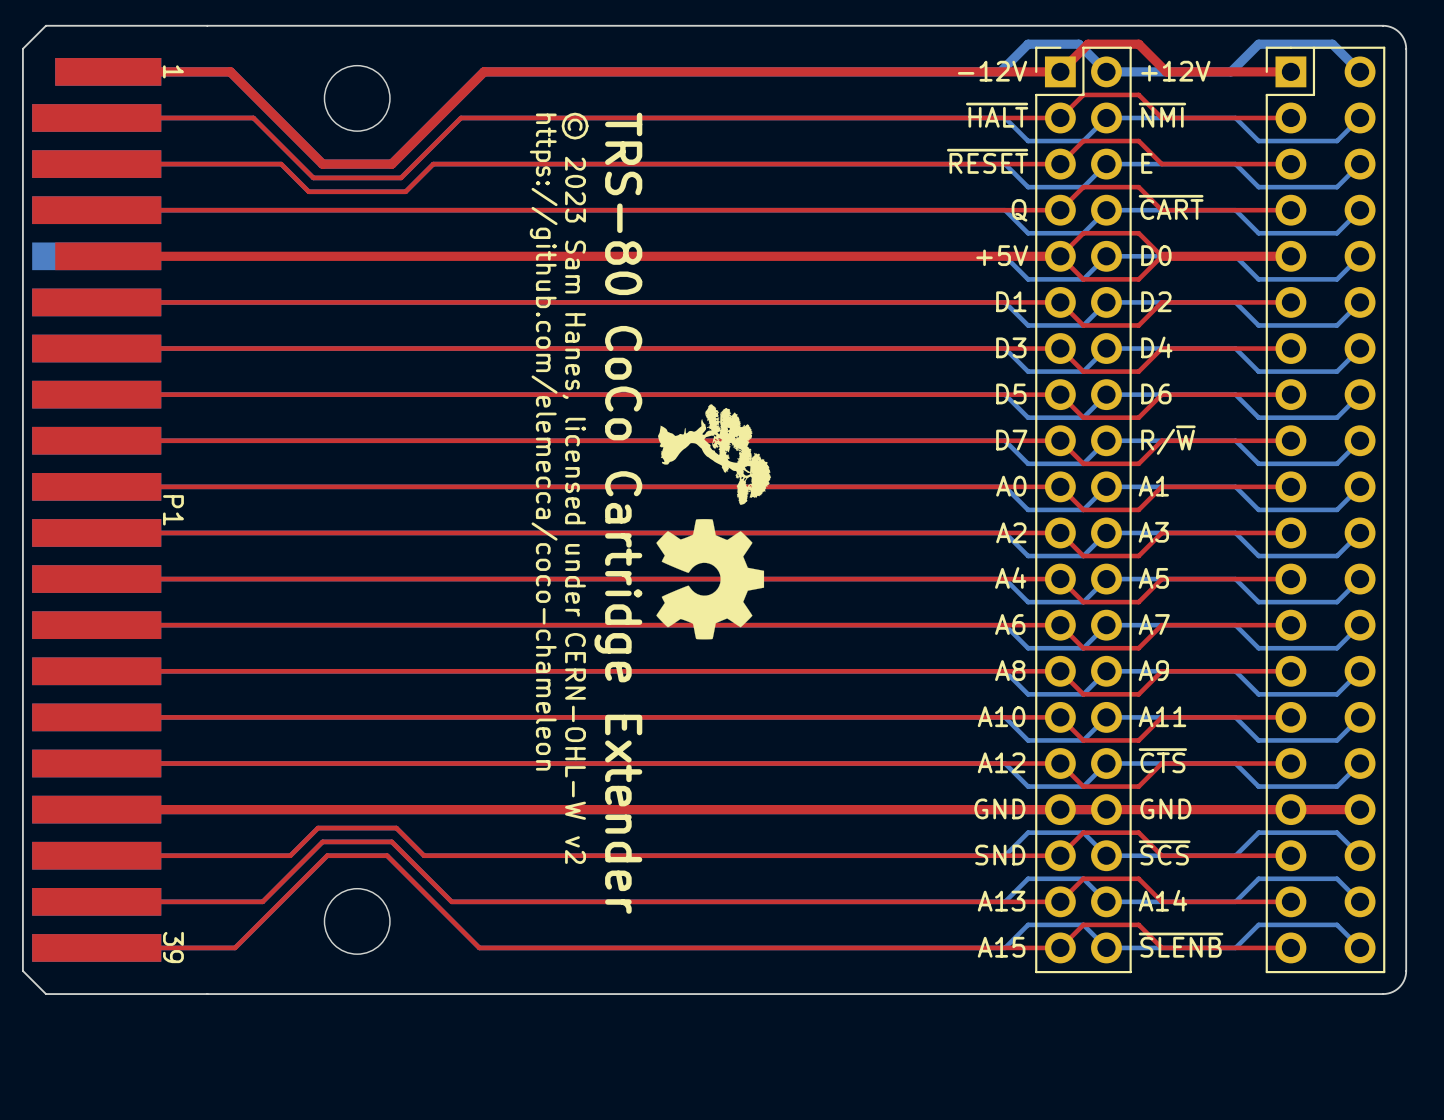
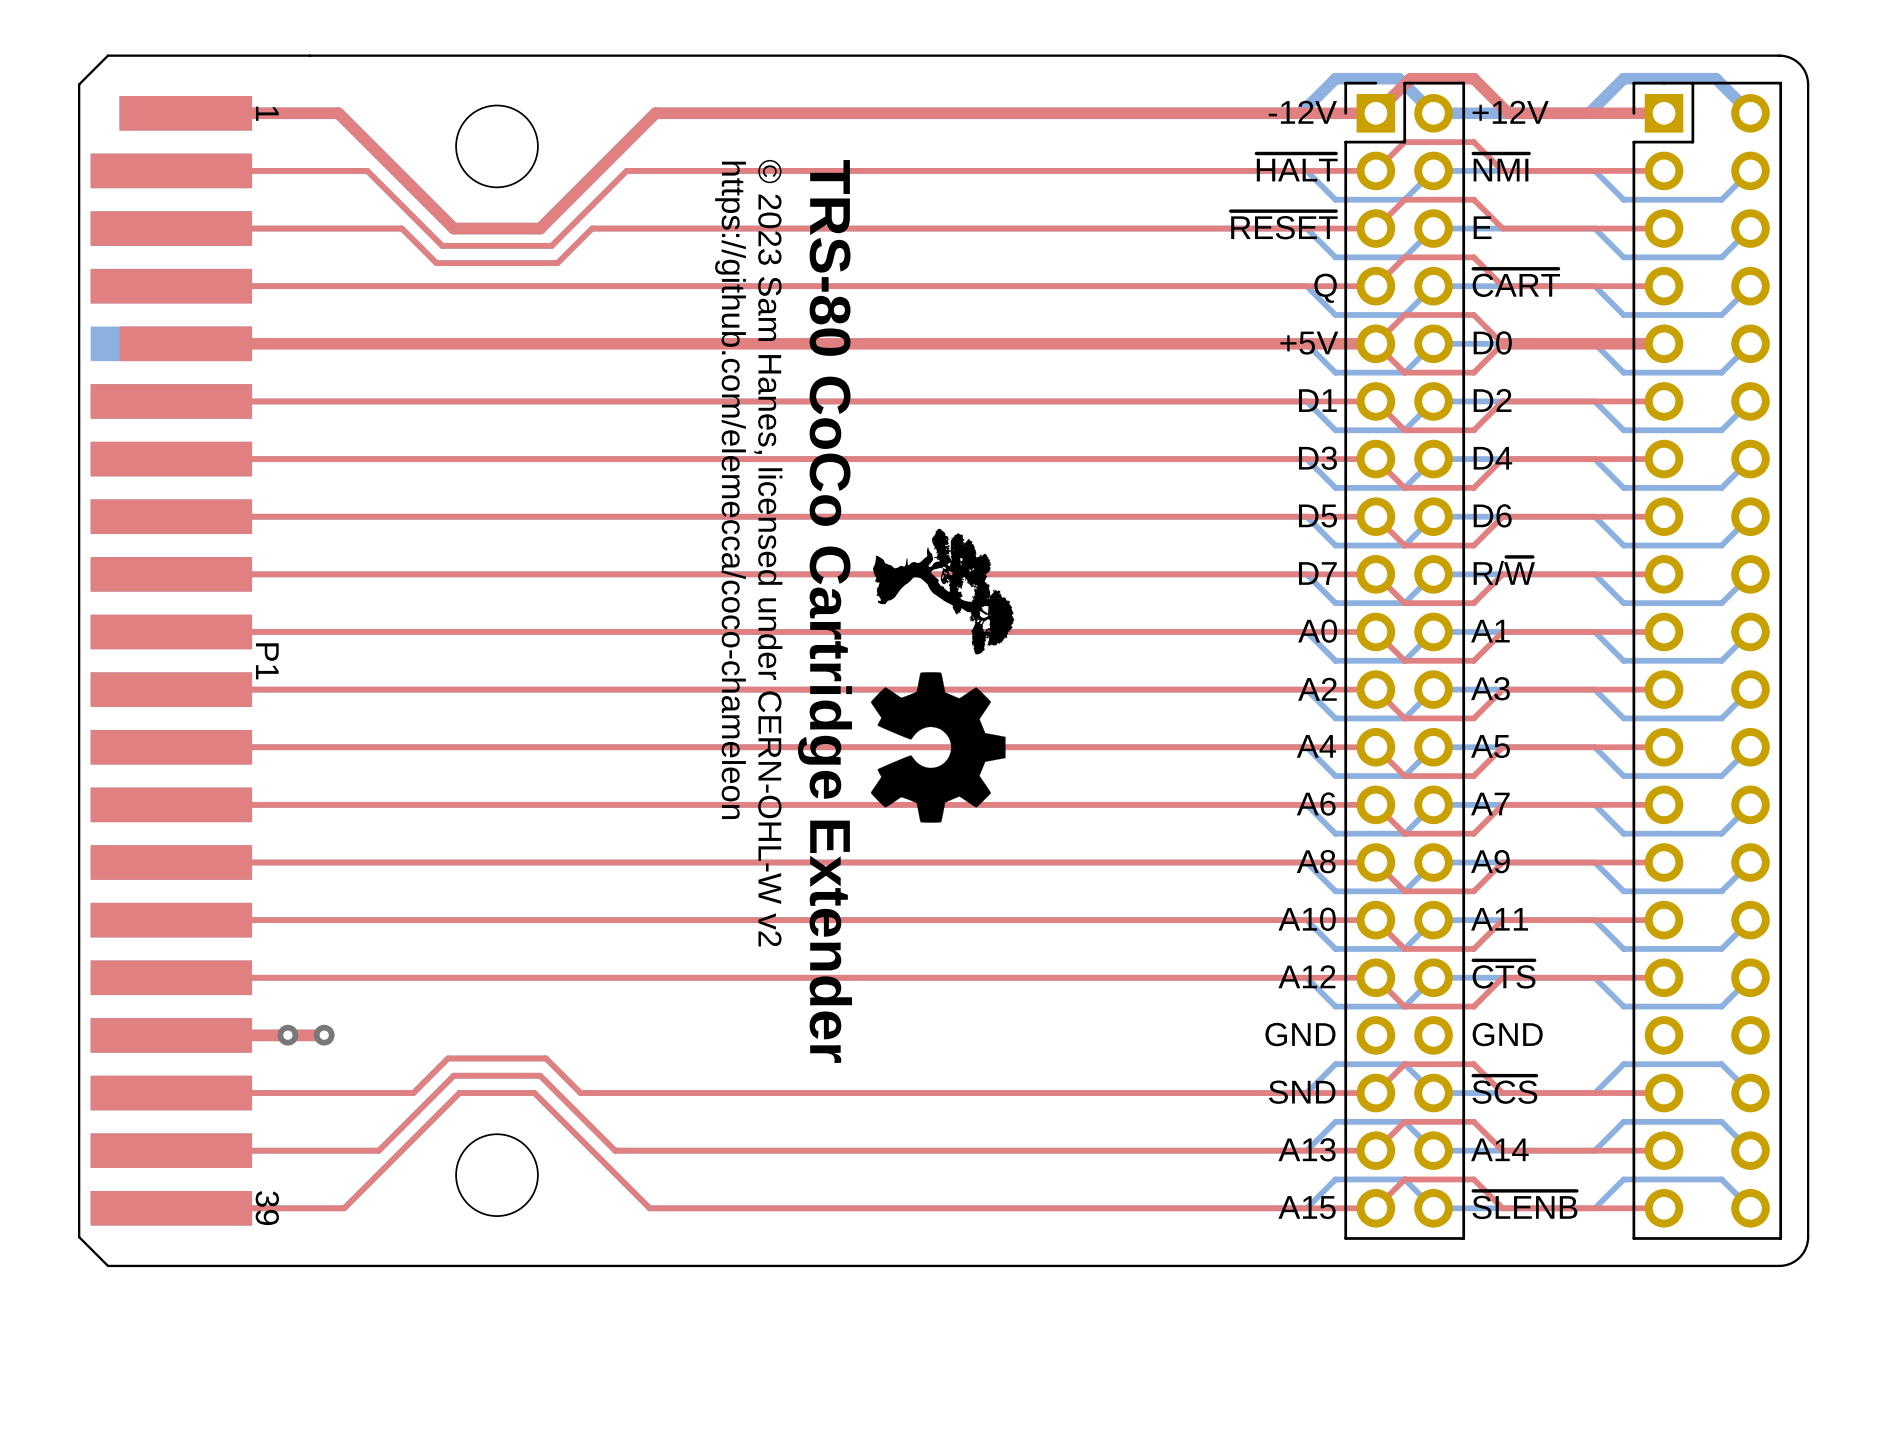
via: none -> (287, 1035)
top track: (218, 809) (1360, 809) -> none
via: none -> (324, 1035)

